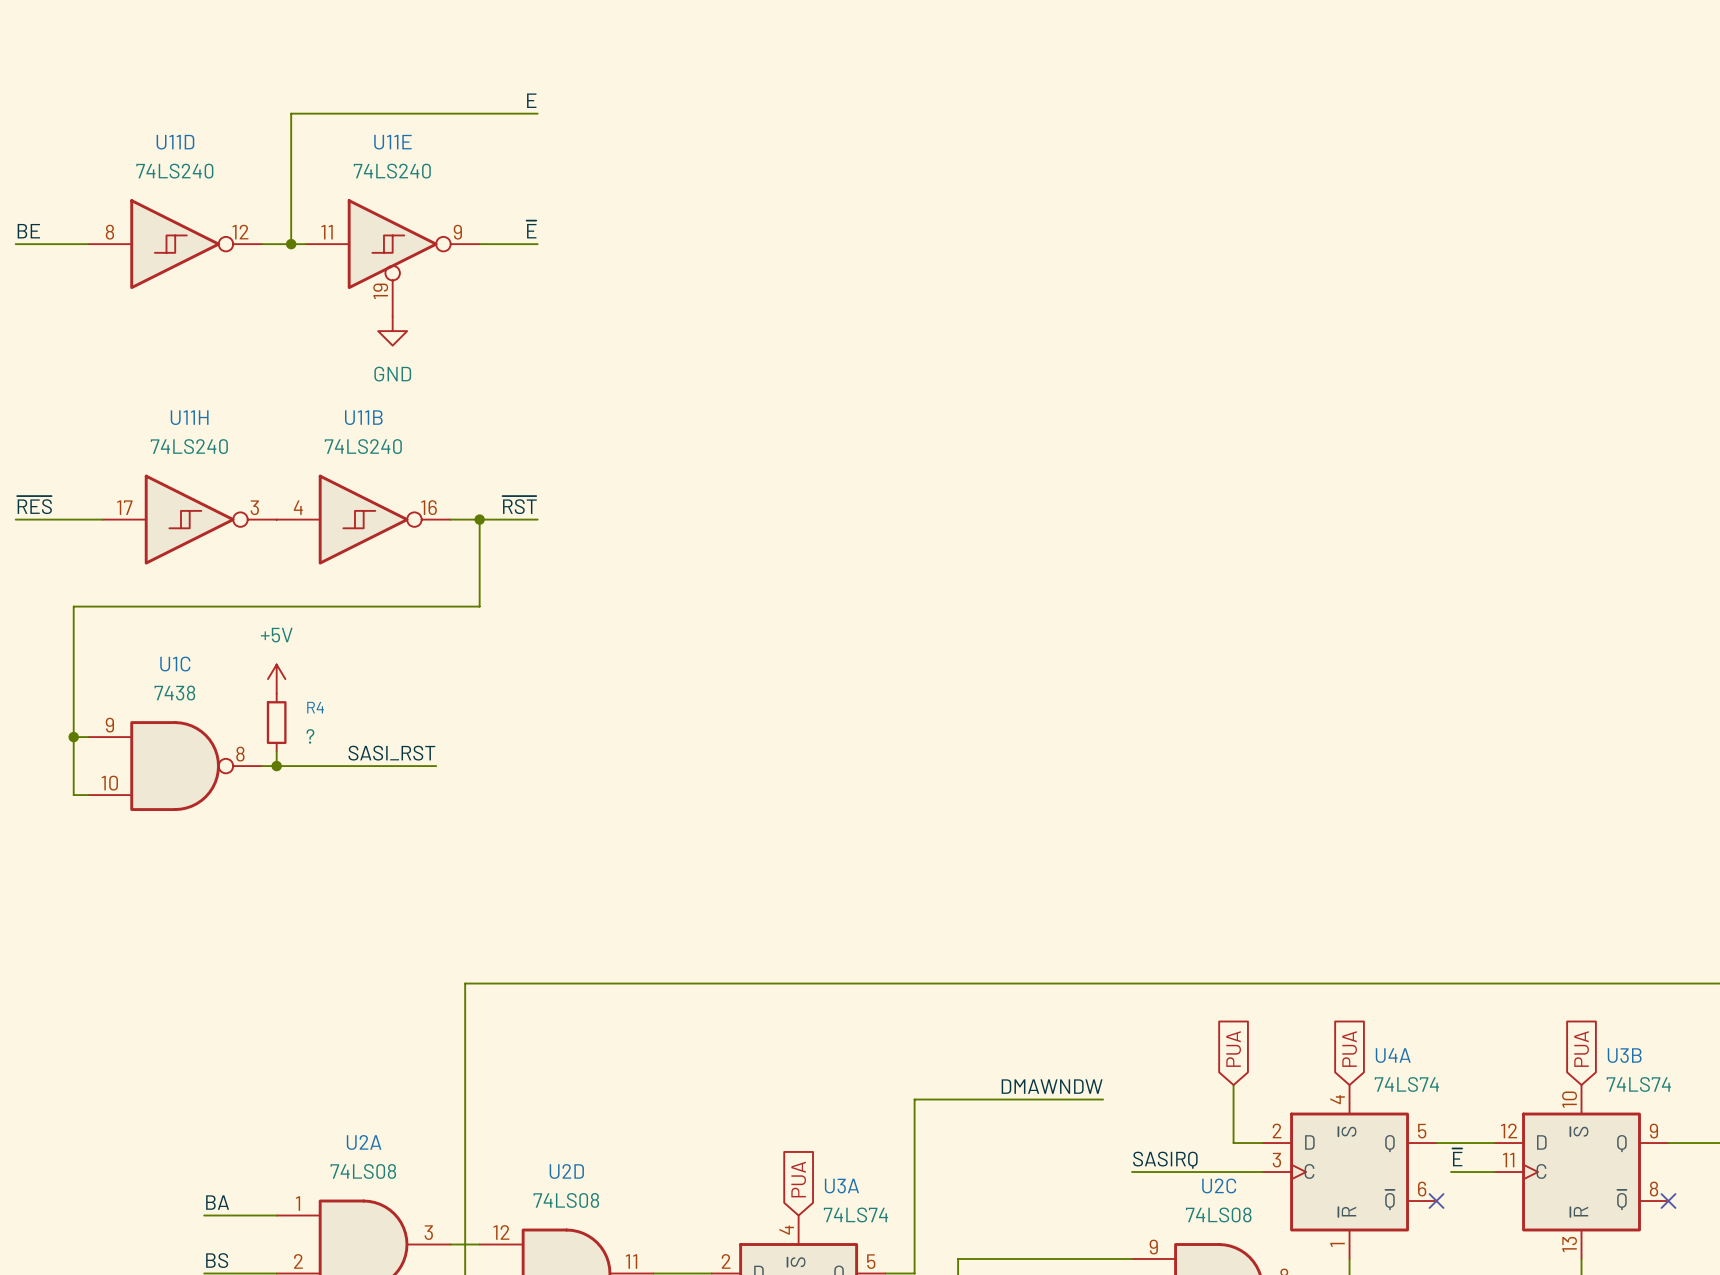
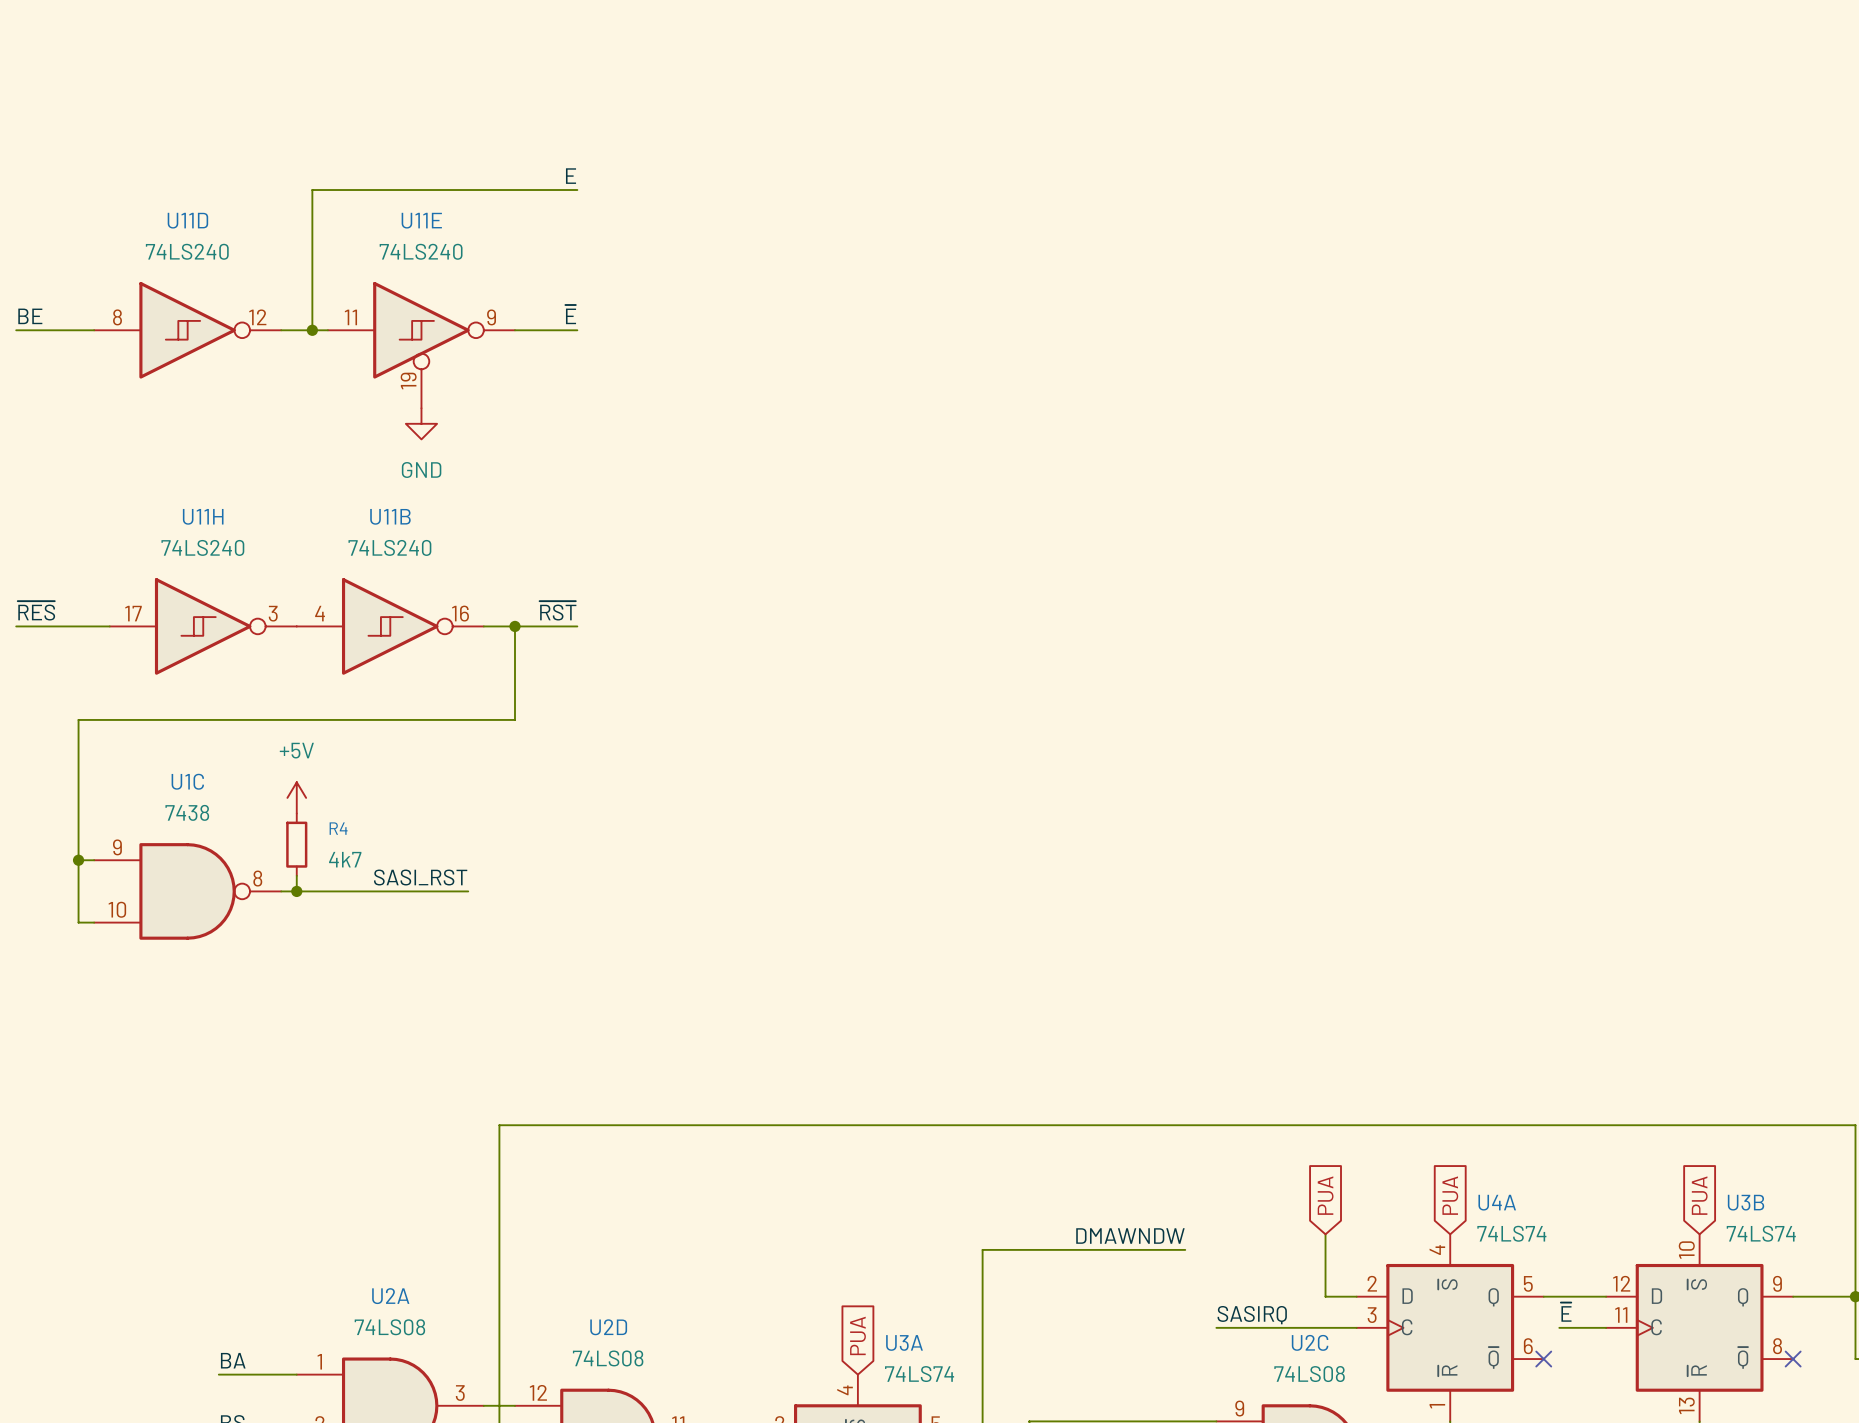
R4 value: ? (310, 736) -> 4k7 (345, 859)

